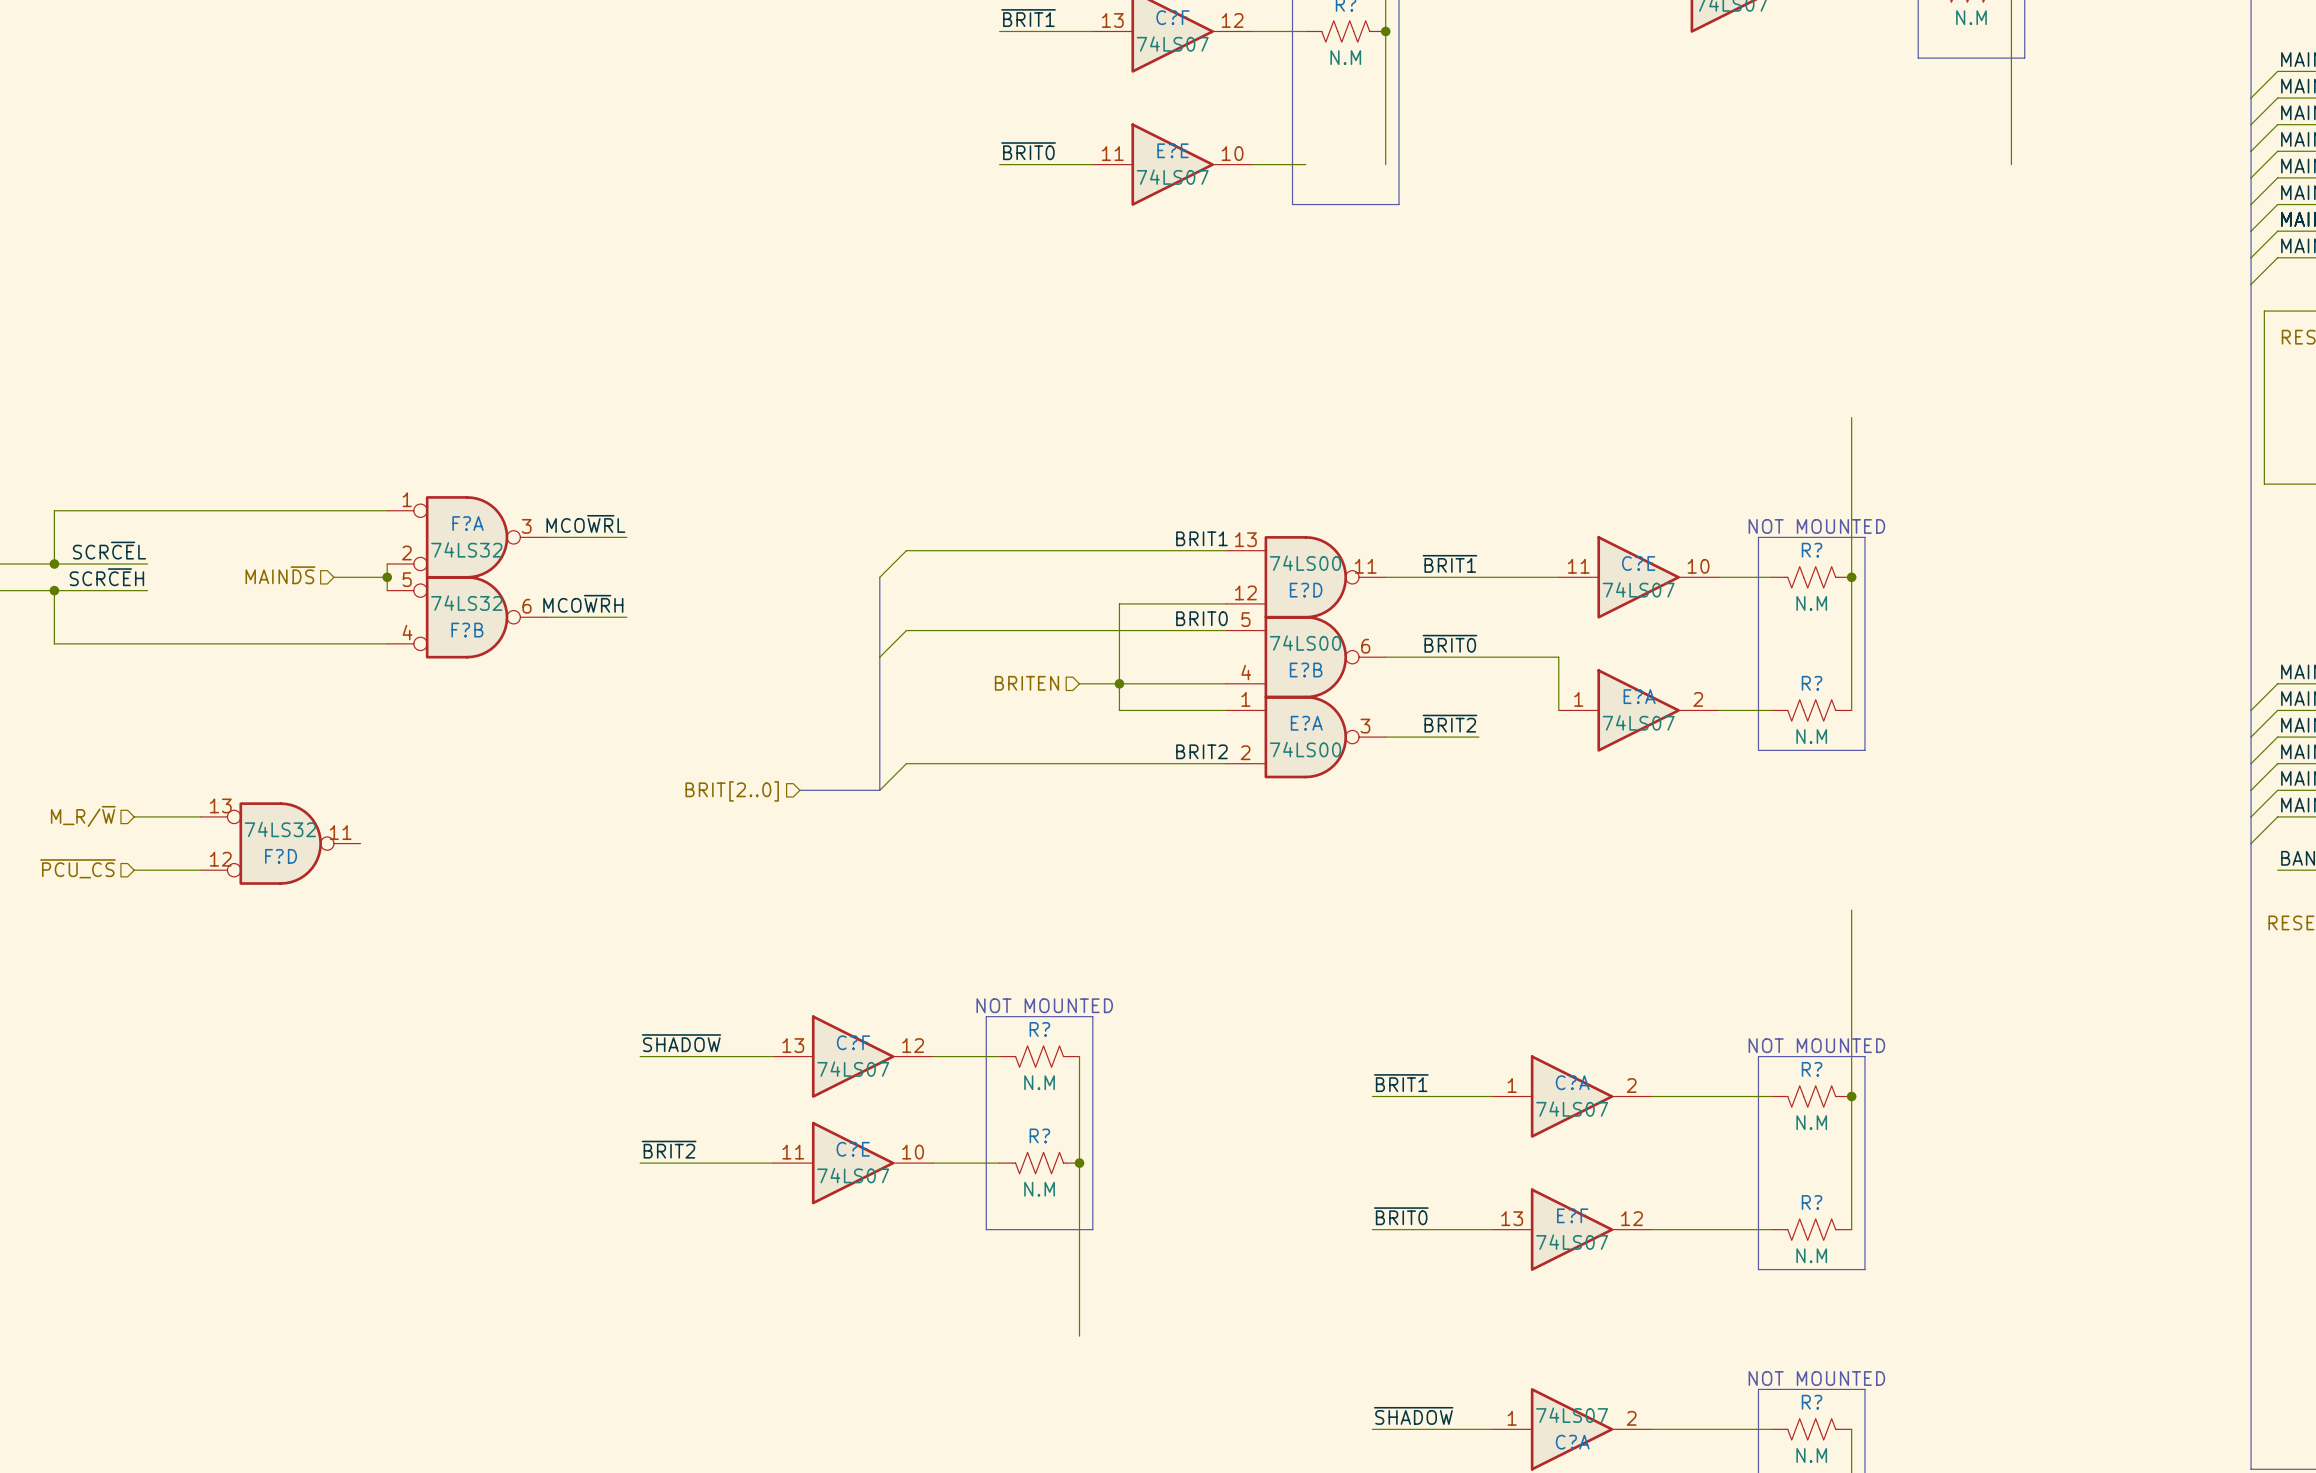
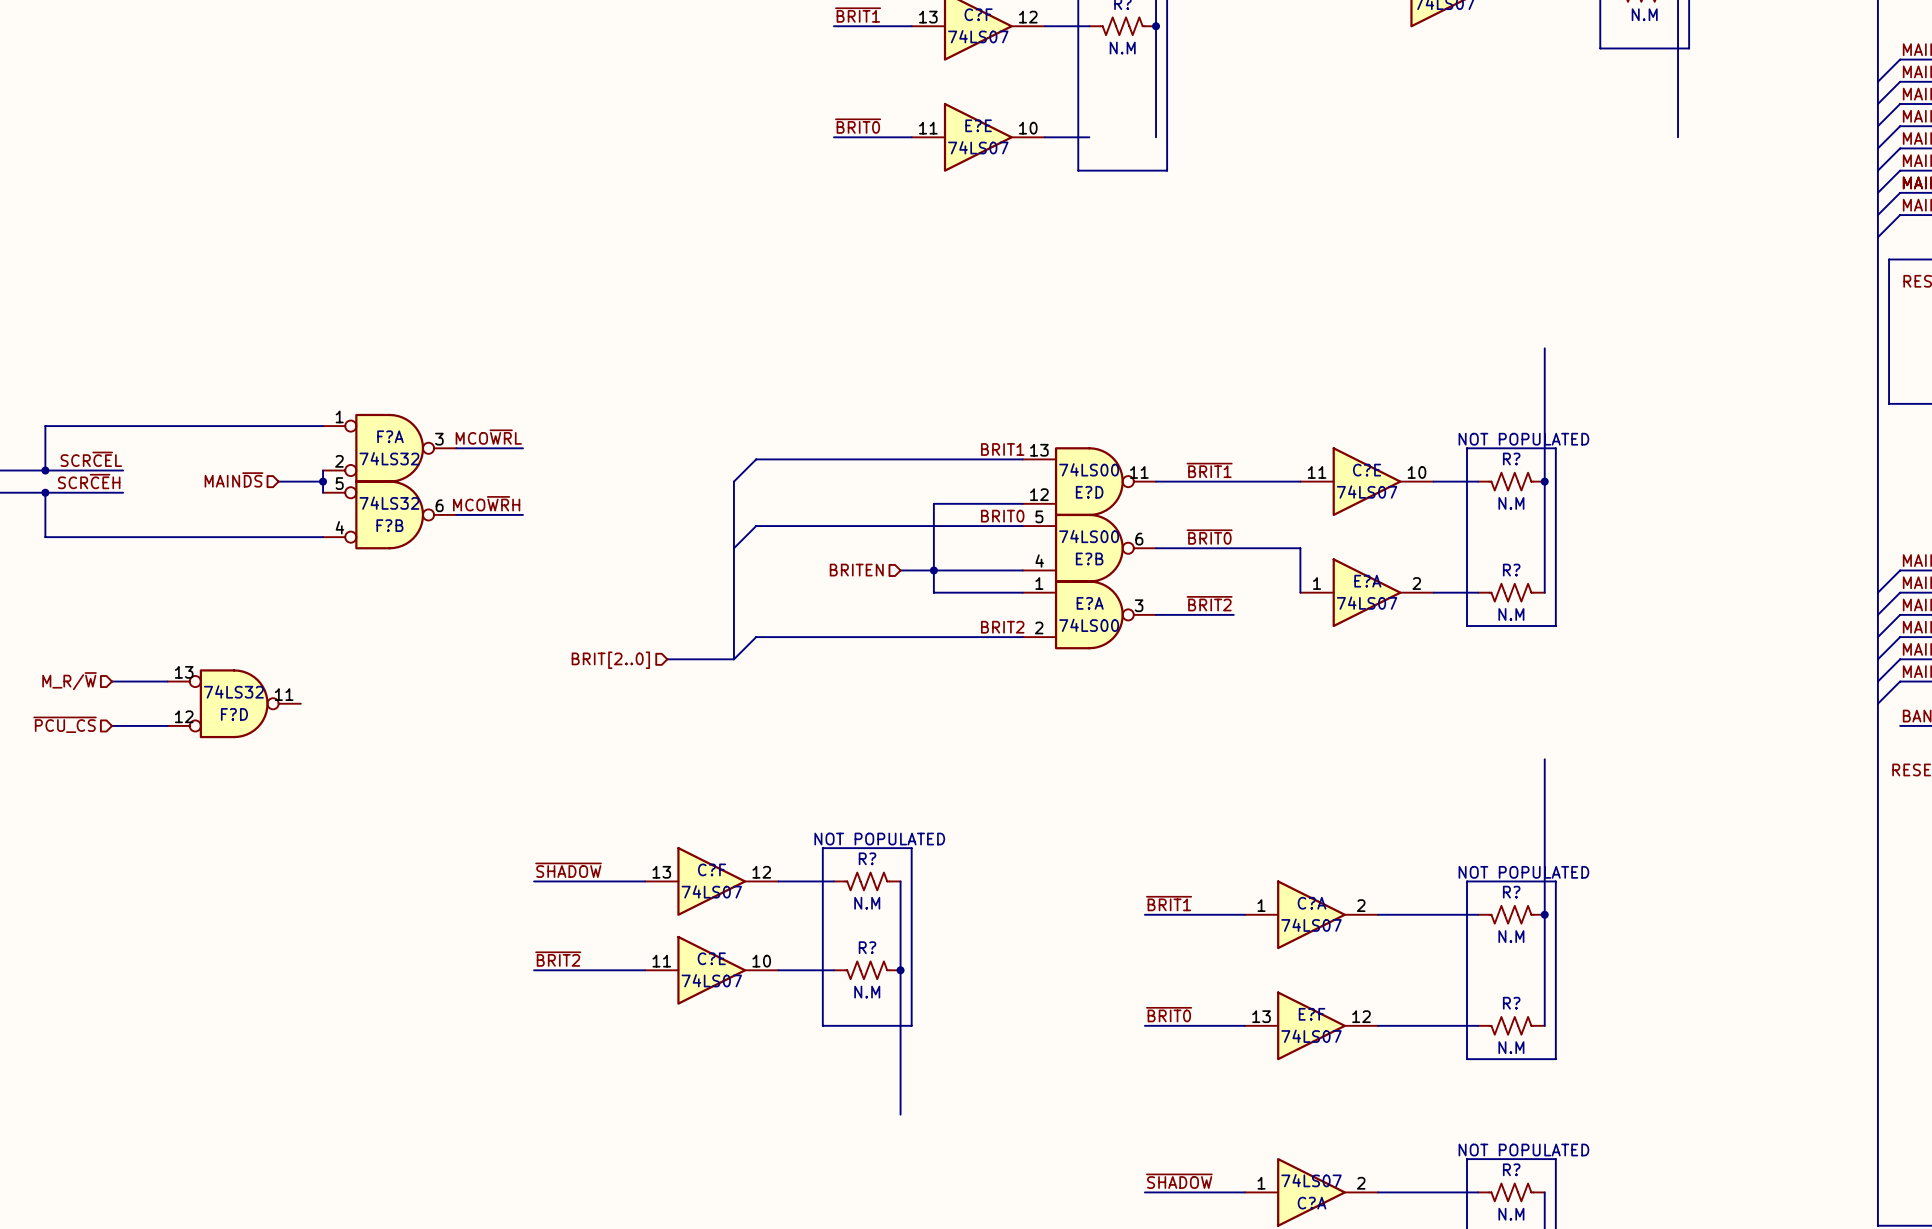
text: NOT MOUNTED (1816, 526) -> NOT POPULATED (1523, 439)
text: NOT MOUNTED (1044, 1005) -> NOT POPULATED (879, 839)
text: NOT MOUNTED (1816, 1045) -> NOT POPULATED (1523, 872)
text: NOT MOUNTED (1816, 1378) -> NOT POPULATED (1523, 1150)

